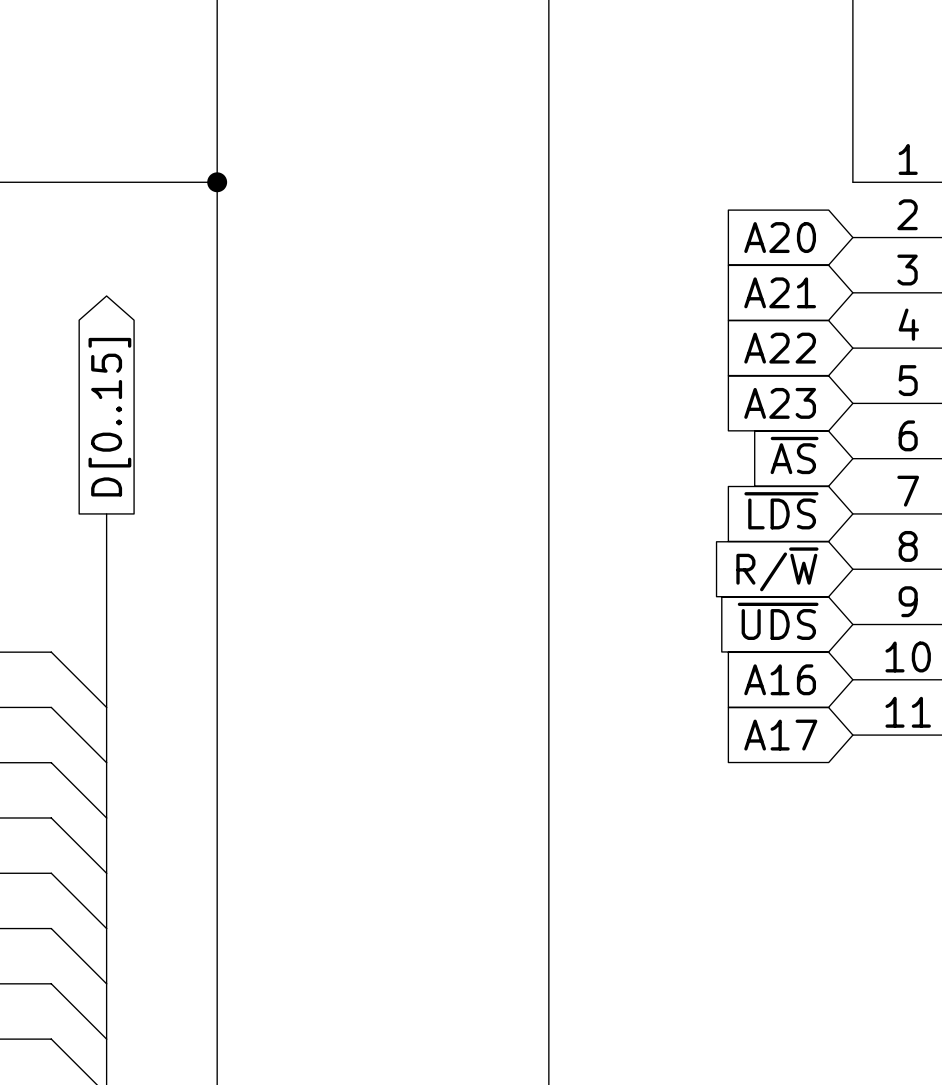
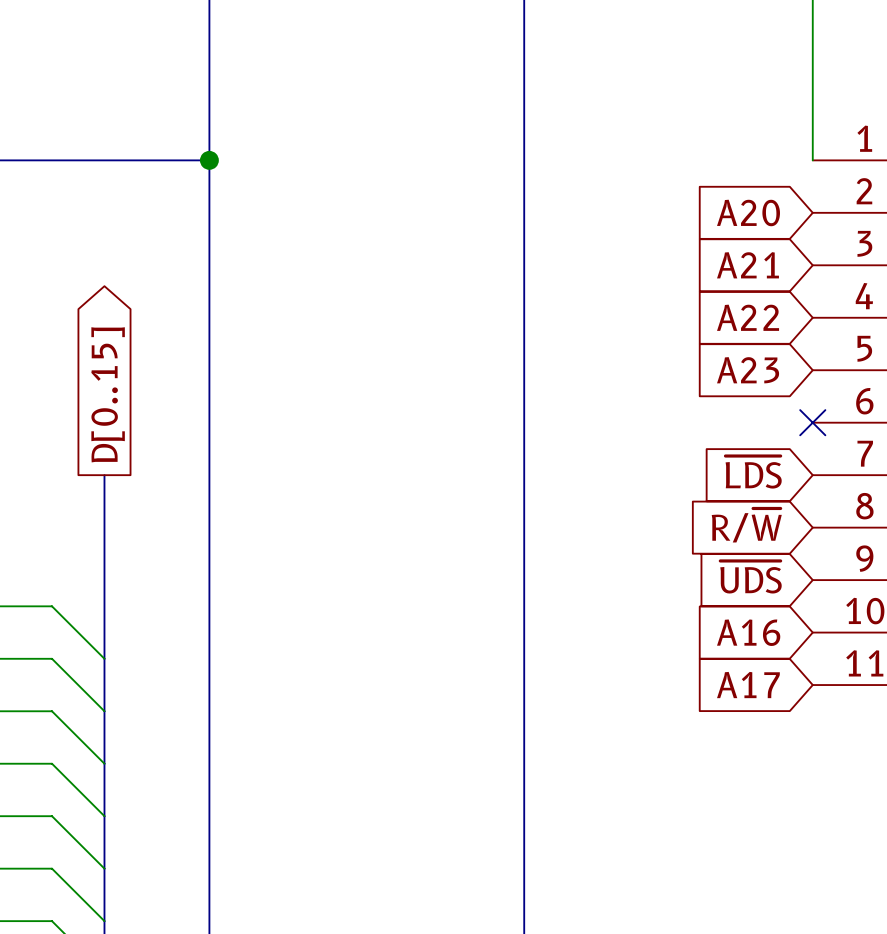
global label: ~{AS} (794, 455) -> none
no-connect mark: none -> (812, 422)

